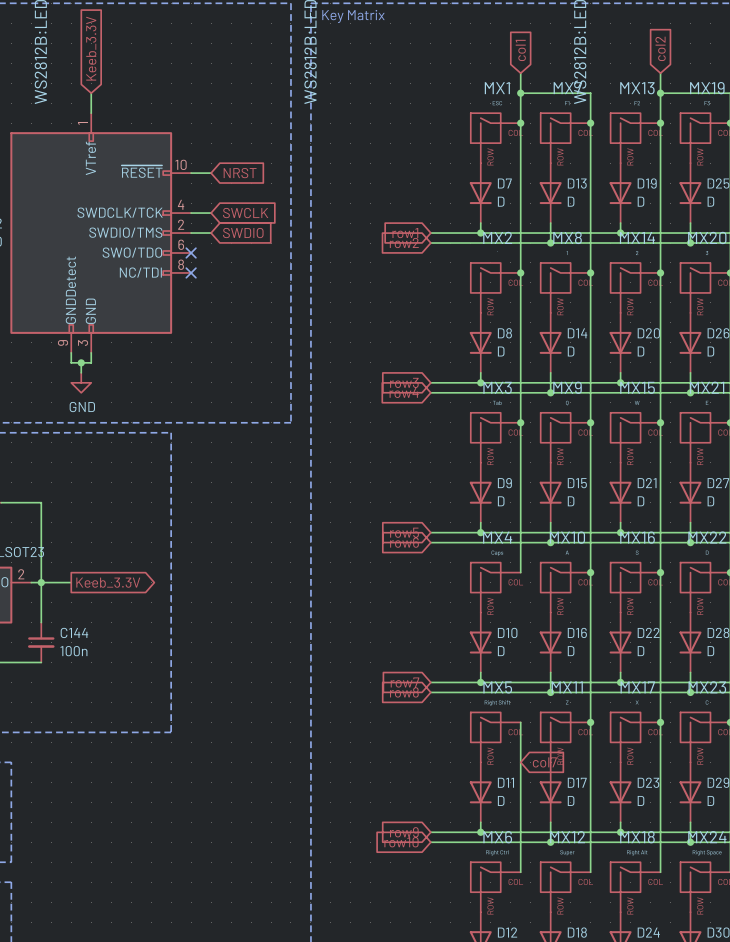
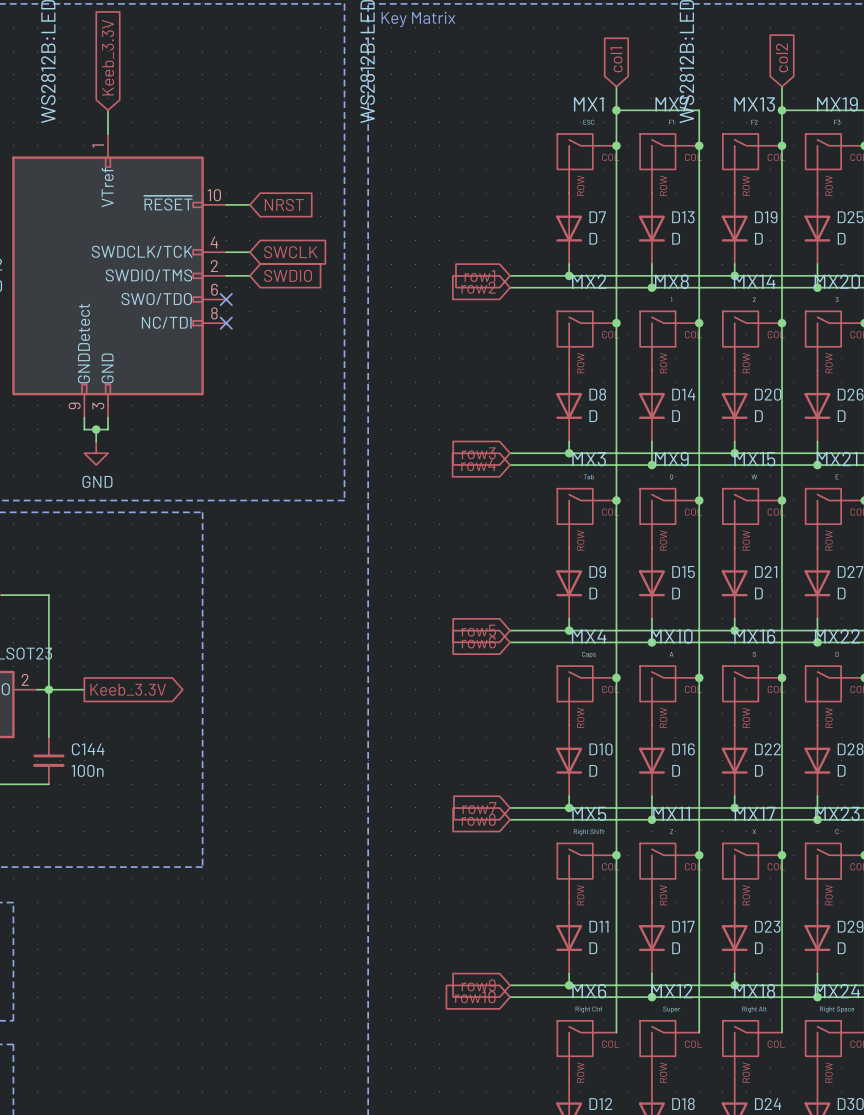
wire: none -> (616, 677) (616, 855)
junction: none -> (616, 677)
junction: none -> (616, 855)
global label: col7 (544, 762) -> none

